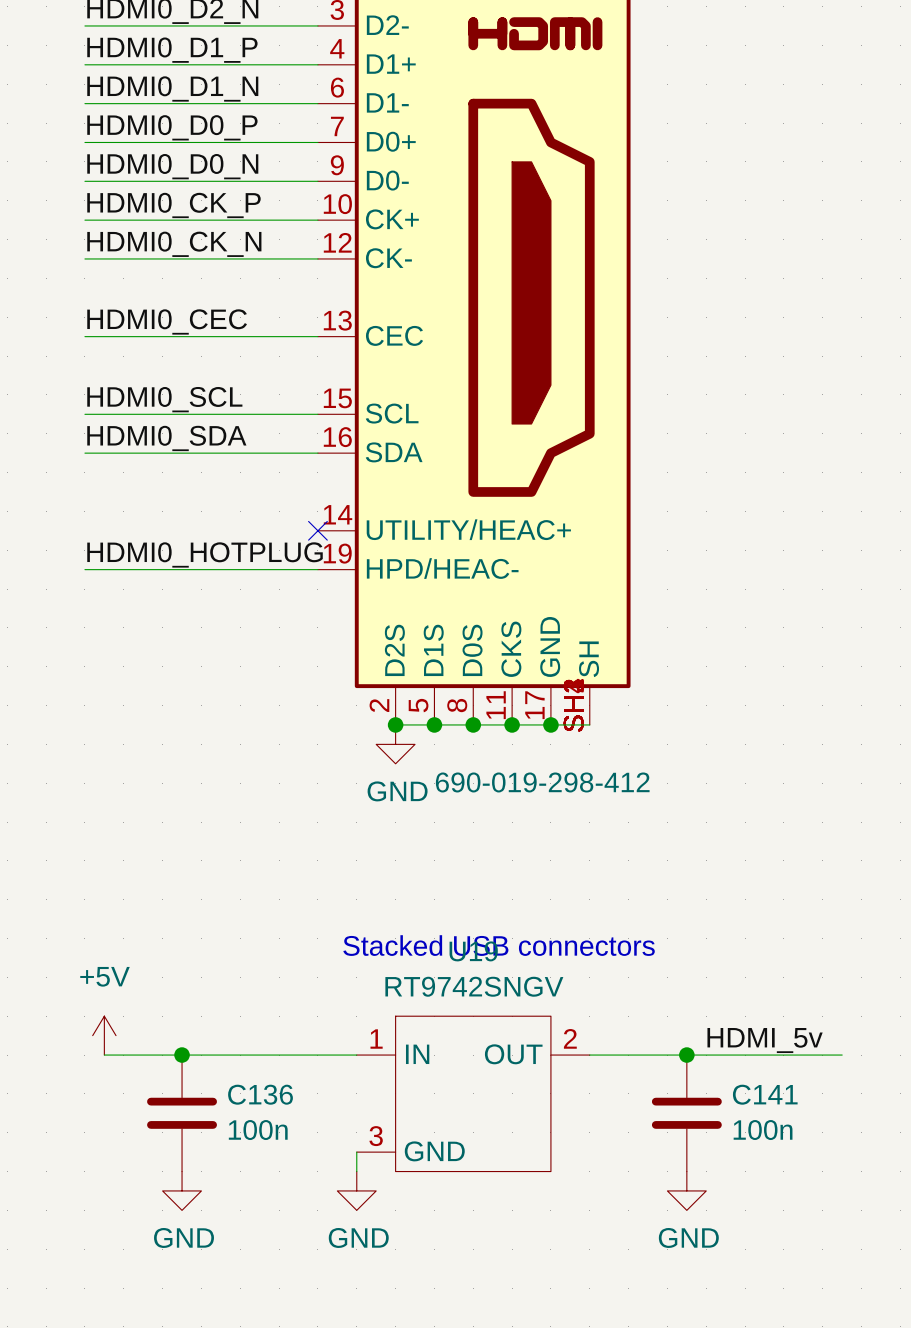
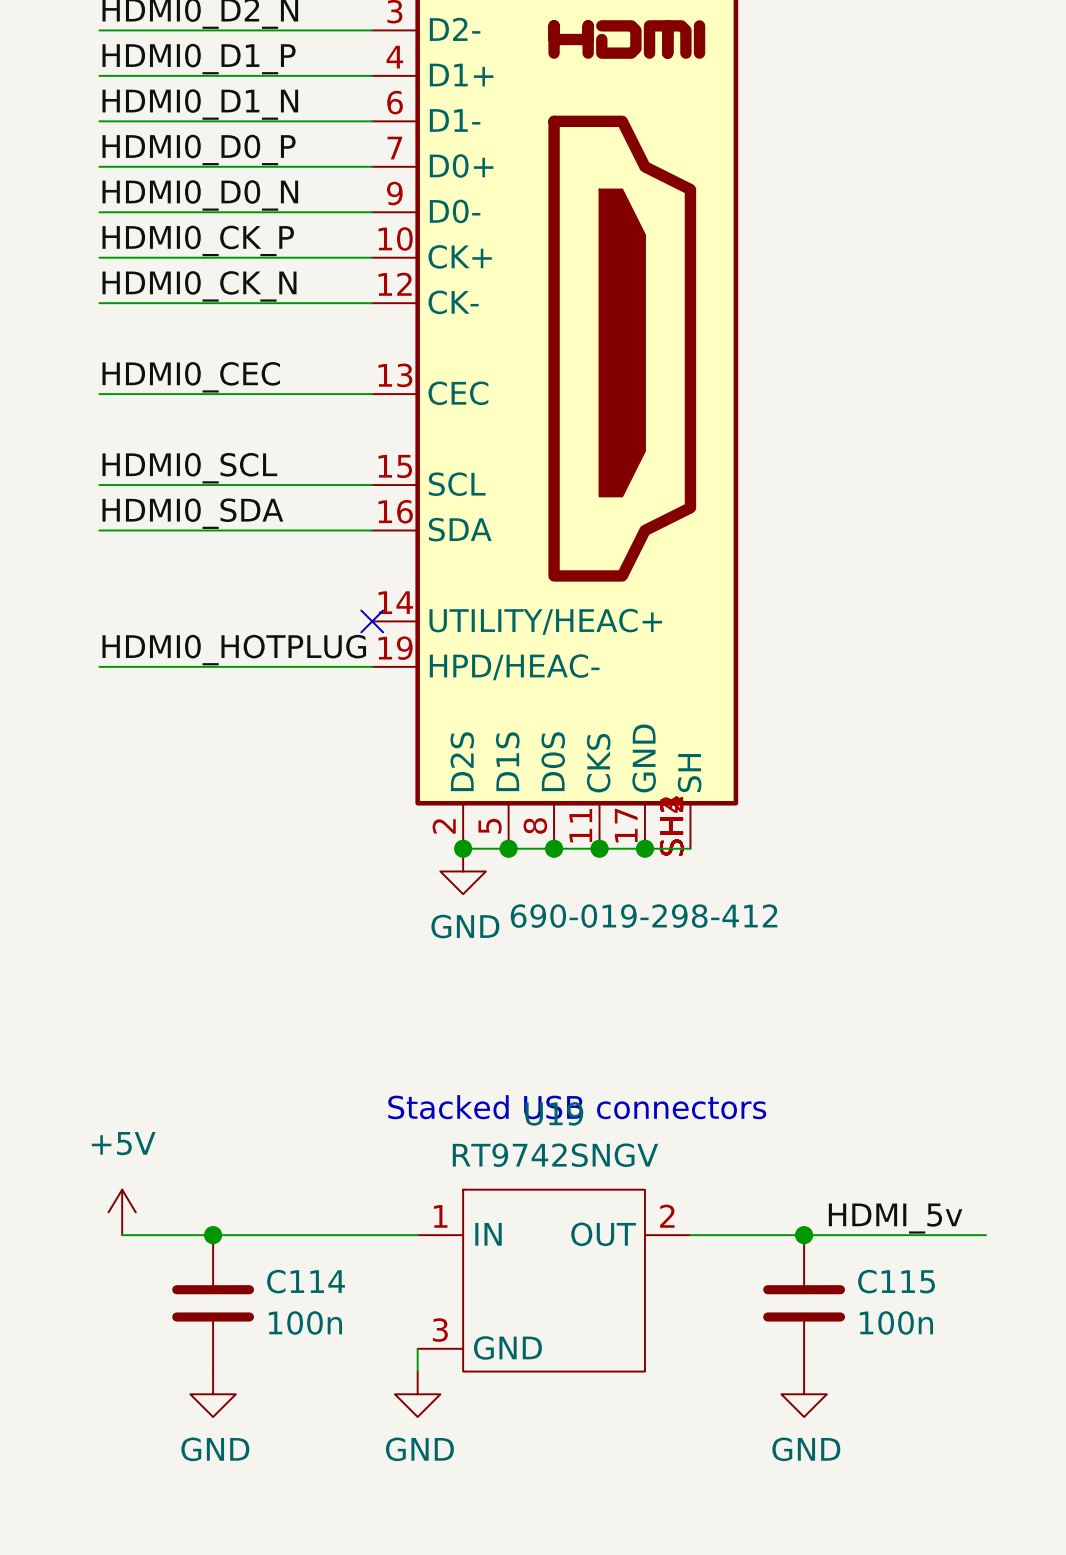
C136 name: C136 (260, 1094) -> C114 (306, 1281)
C141 name: C141 (765, 1094) -> C115 (896, 1281)

